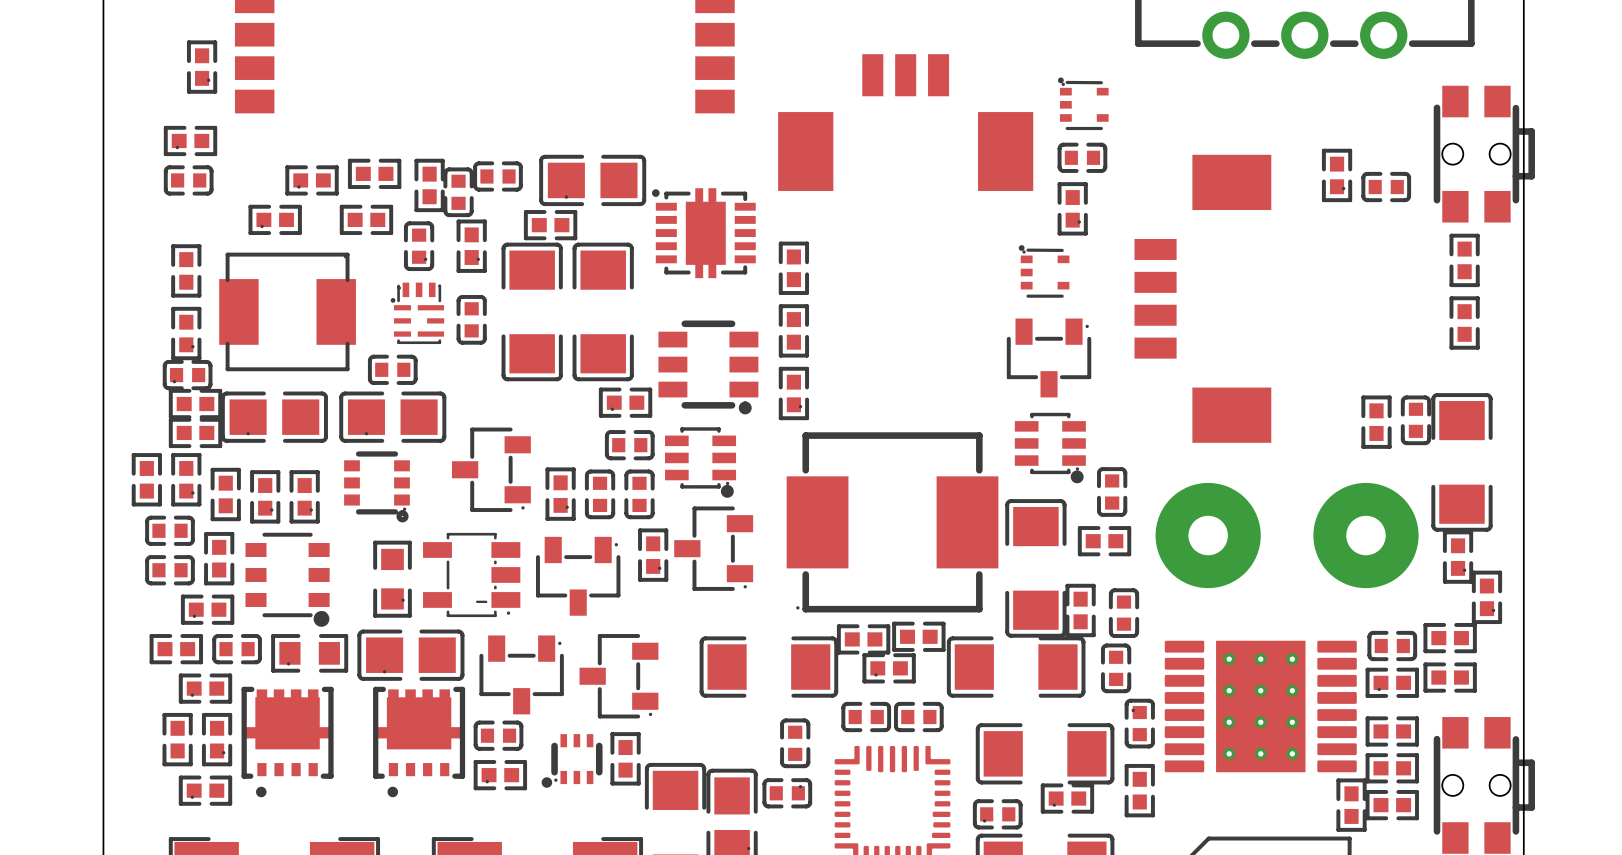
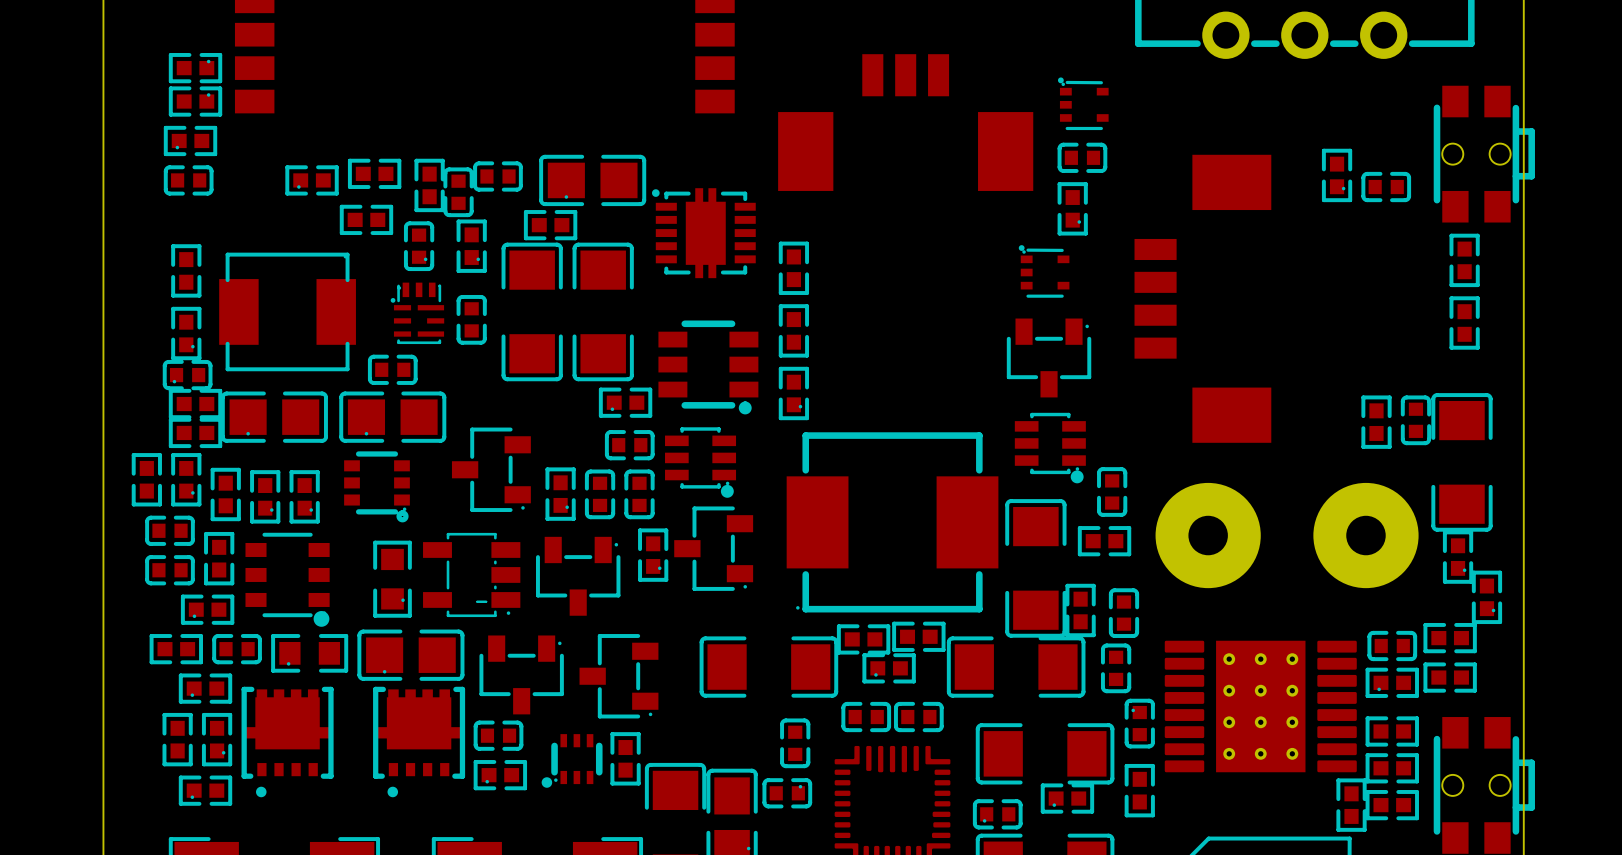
part rotation: 0° (202, 67) -> 90° counterclockwise (195, 68)
part rotation: 0° (275, 219) -> 180° (195, 101)
part position: (275, 219) -> (195, 101)

